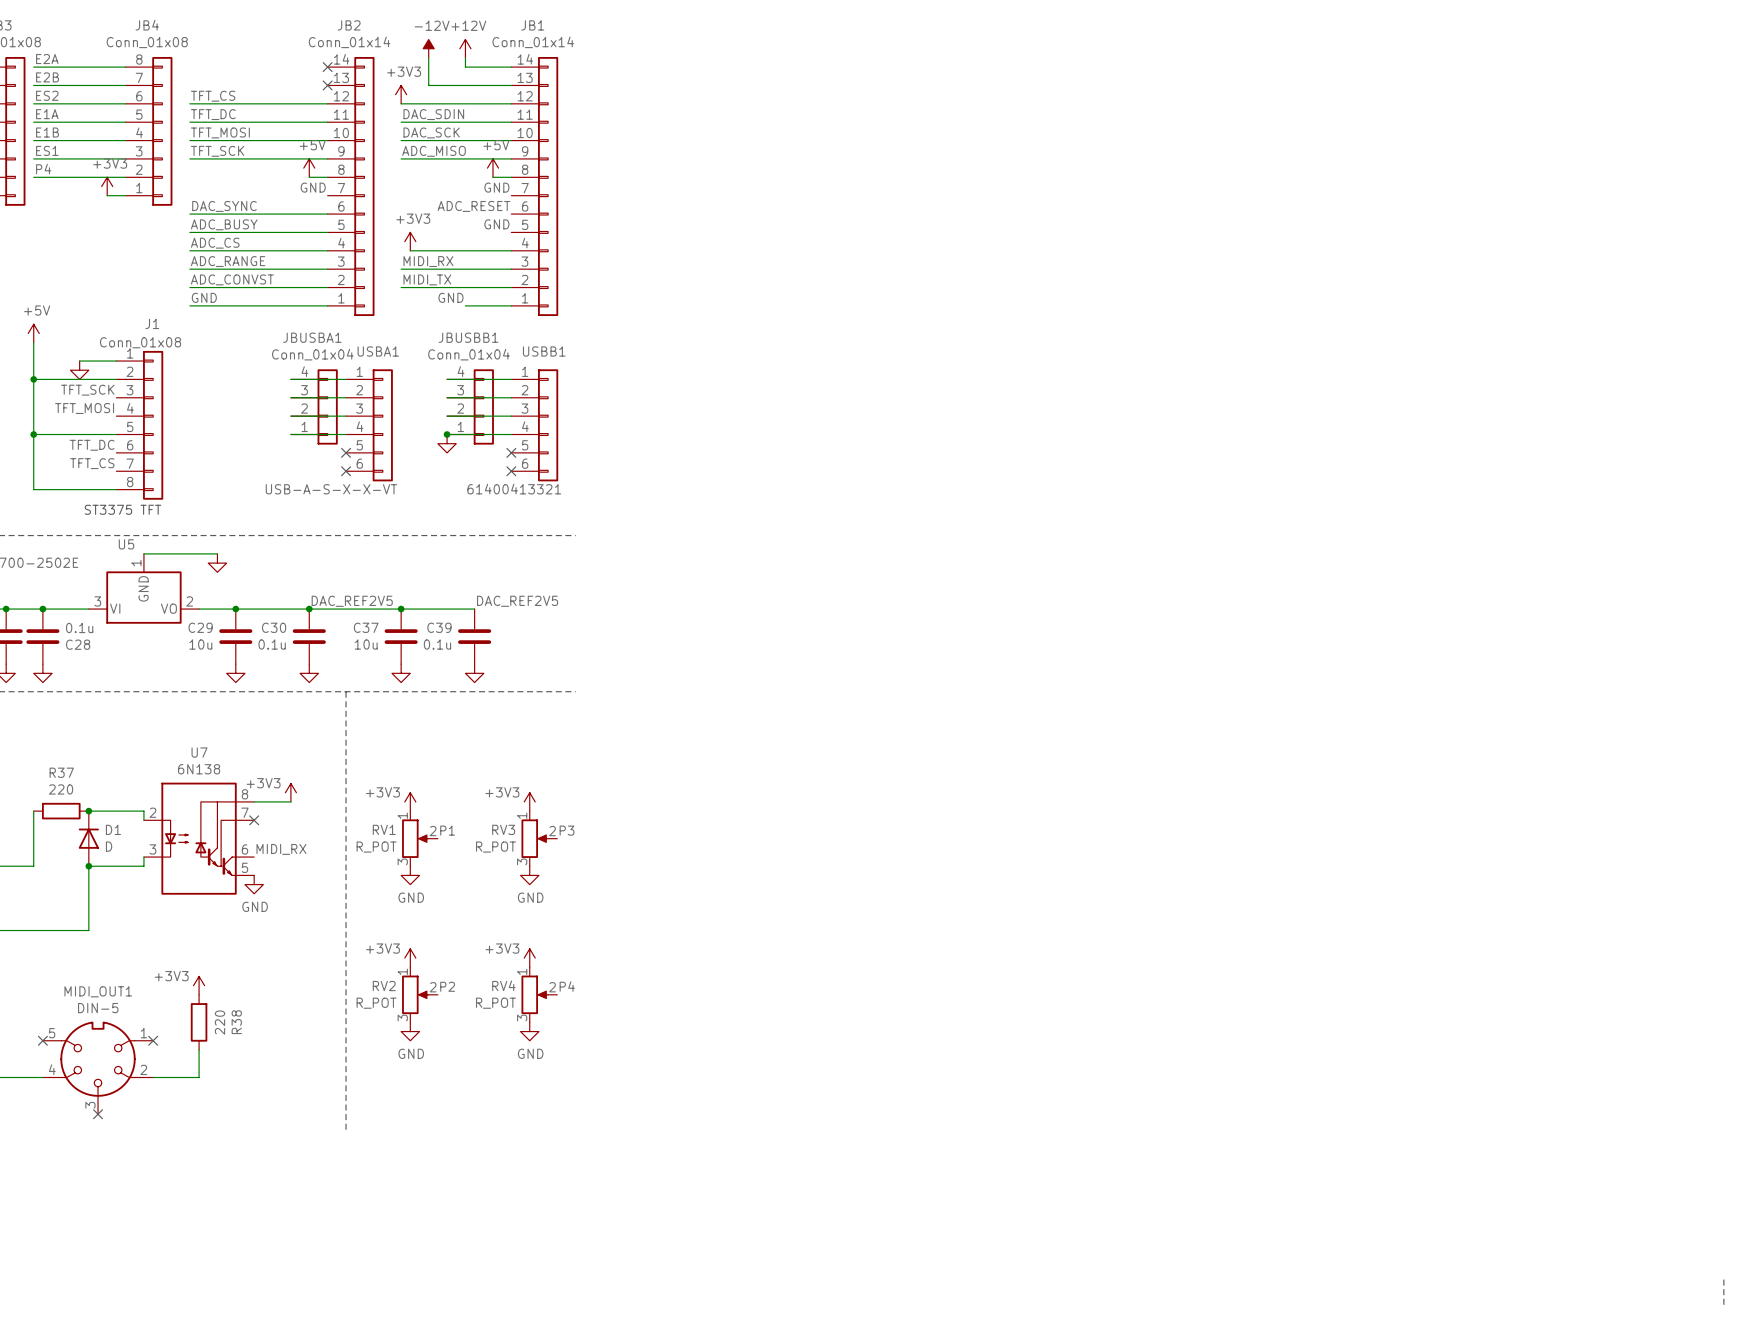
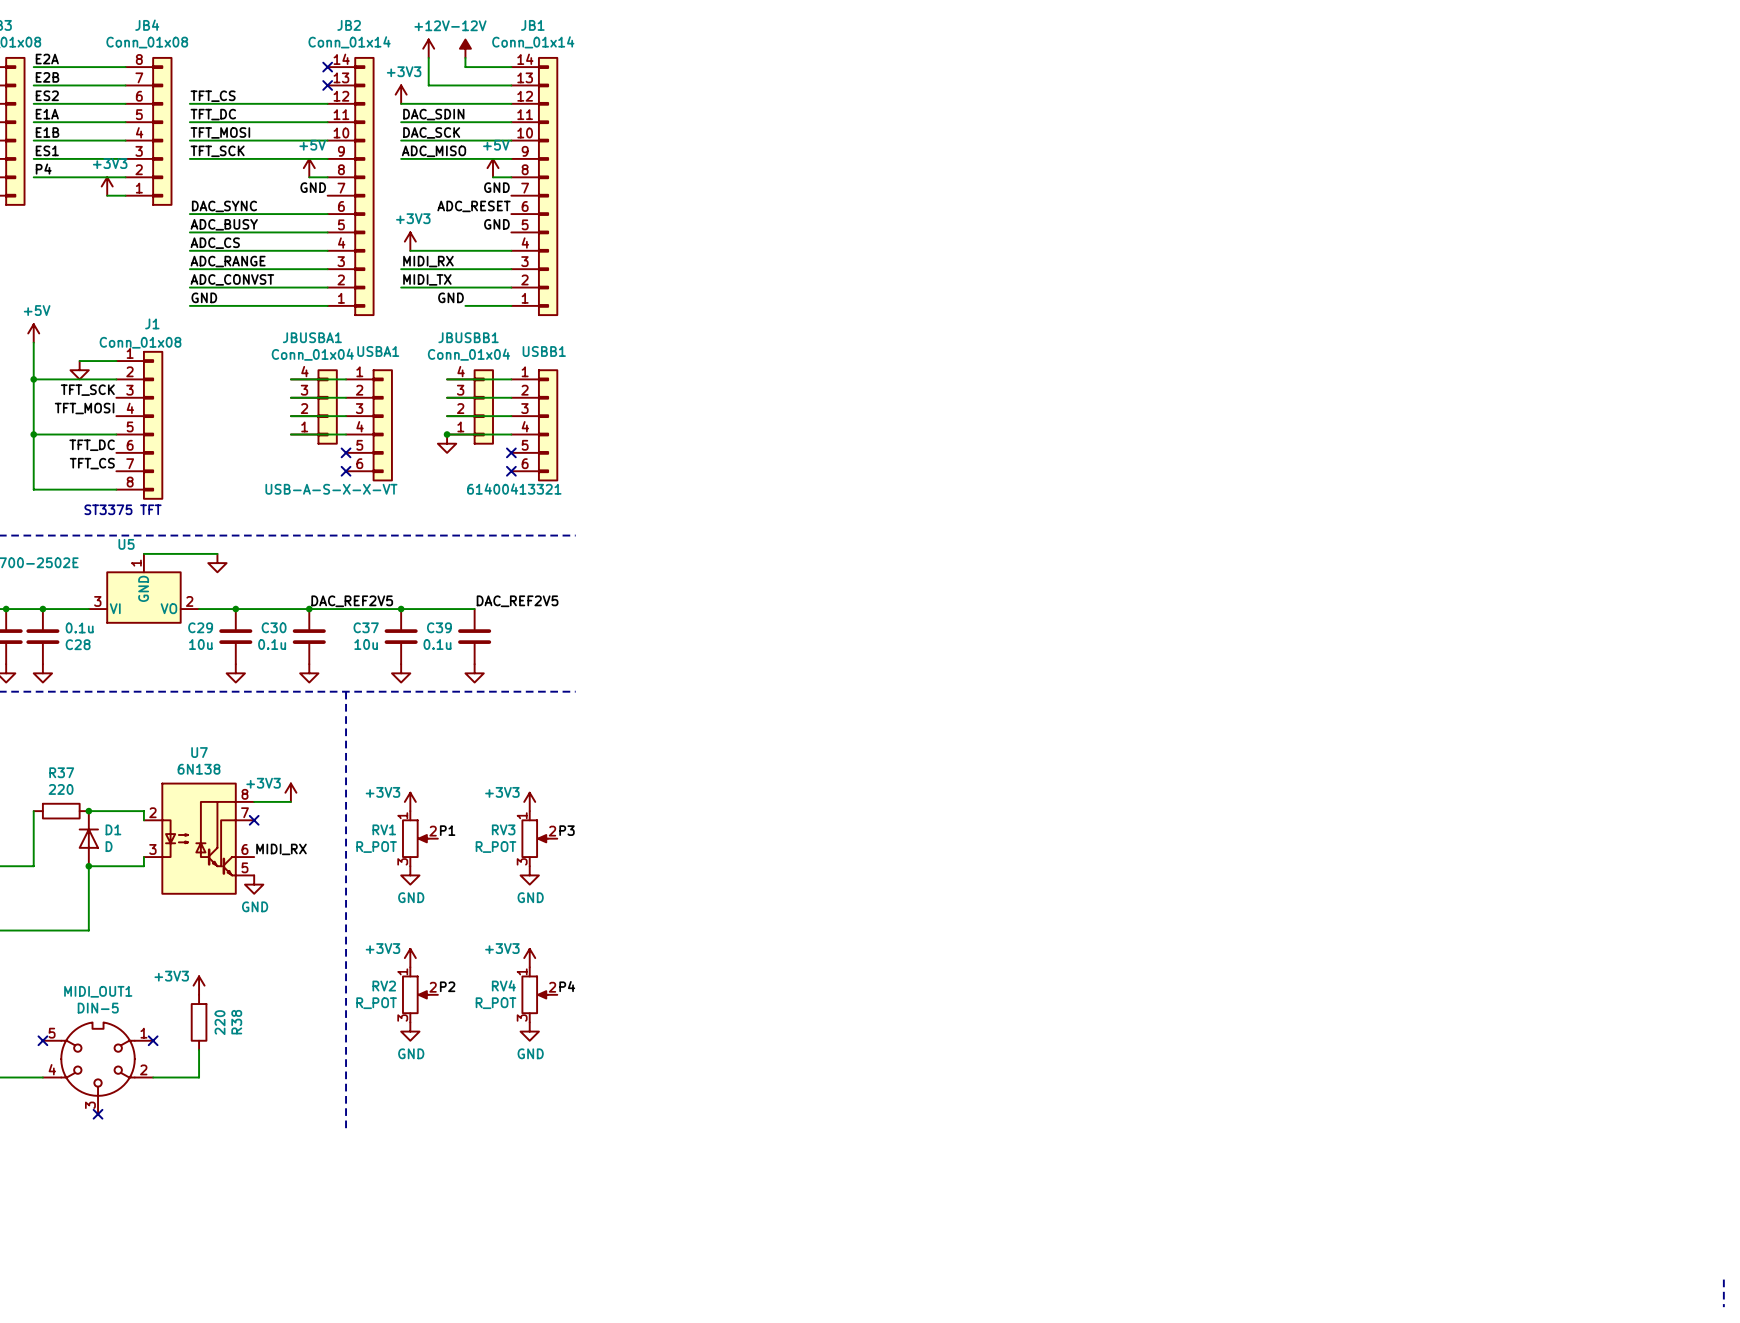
power symbol: -12V (428, 48) -> +12V (428, 48)
power symbol: +12V (465, 48) -> -12V (465, 48)

